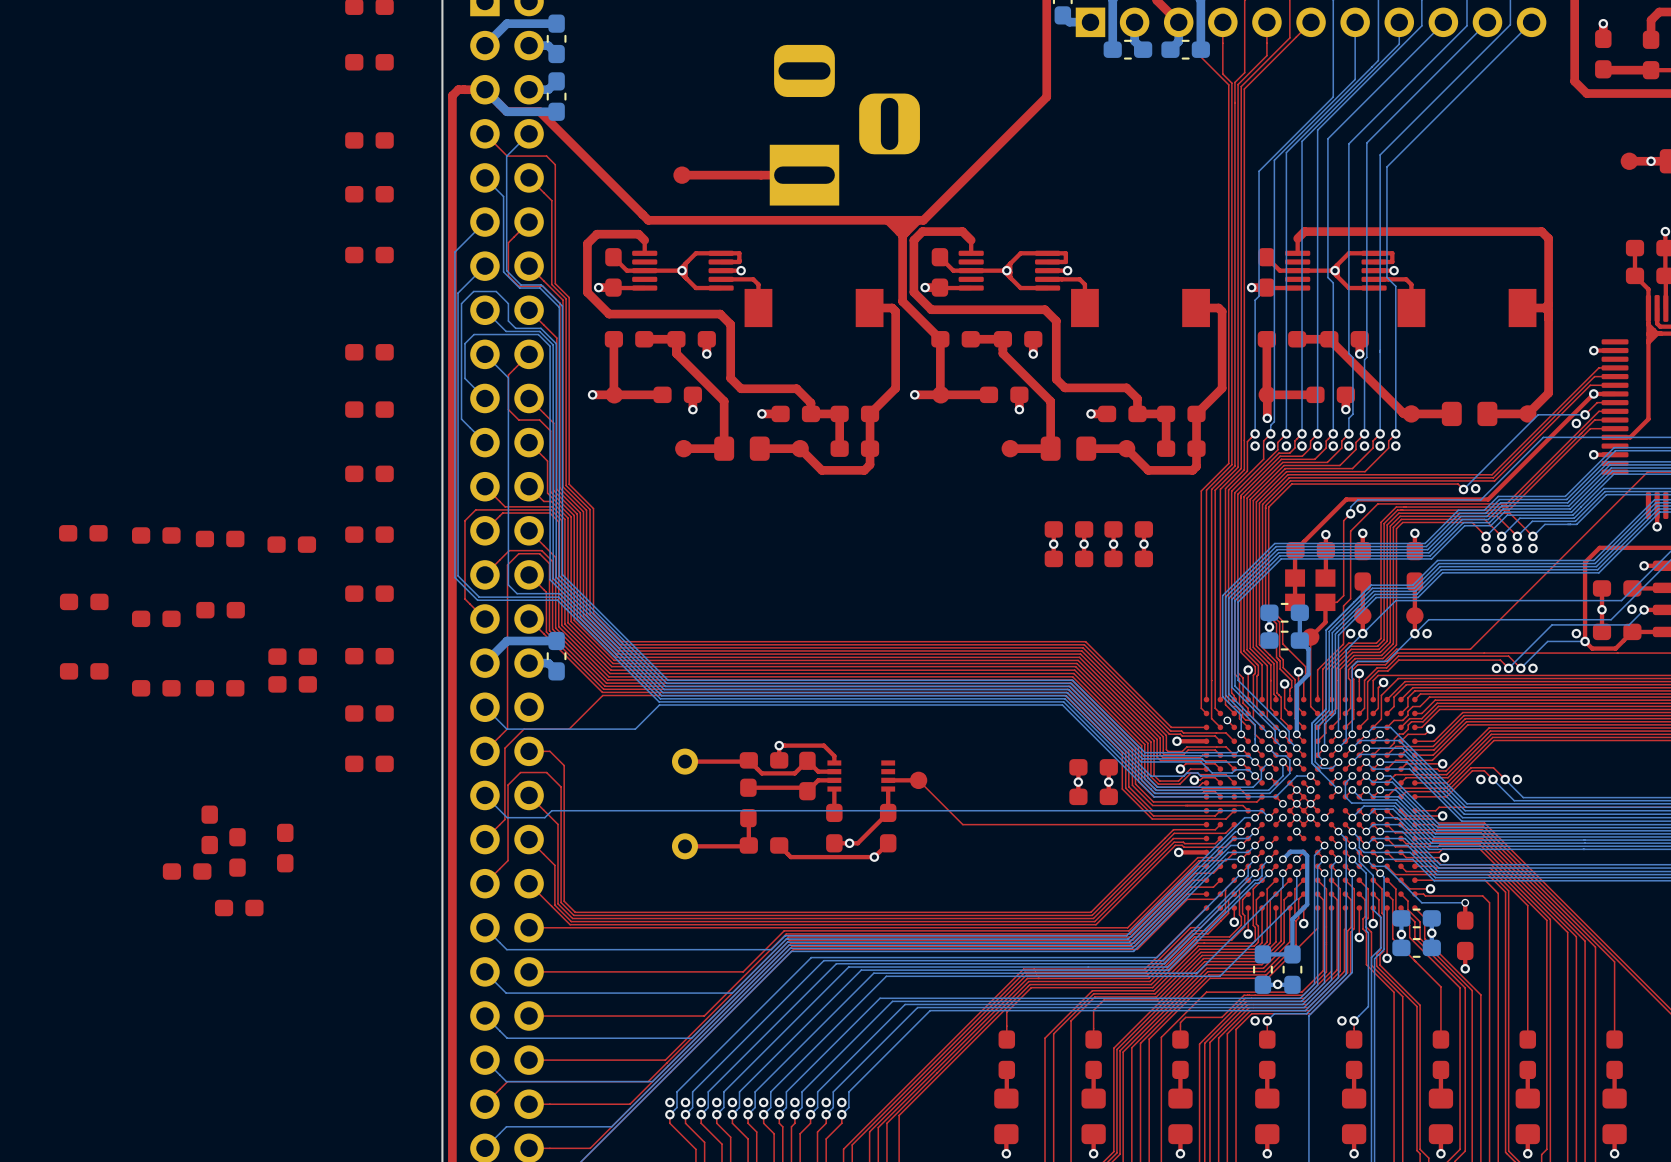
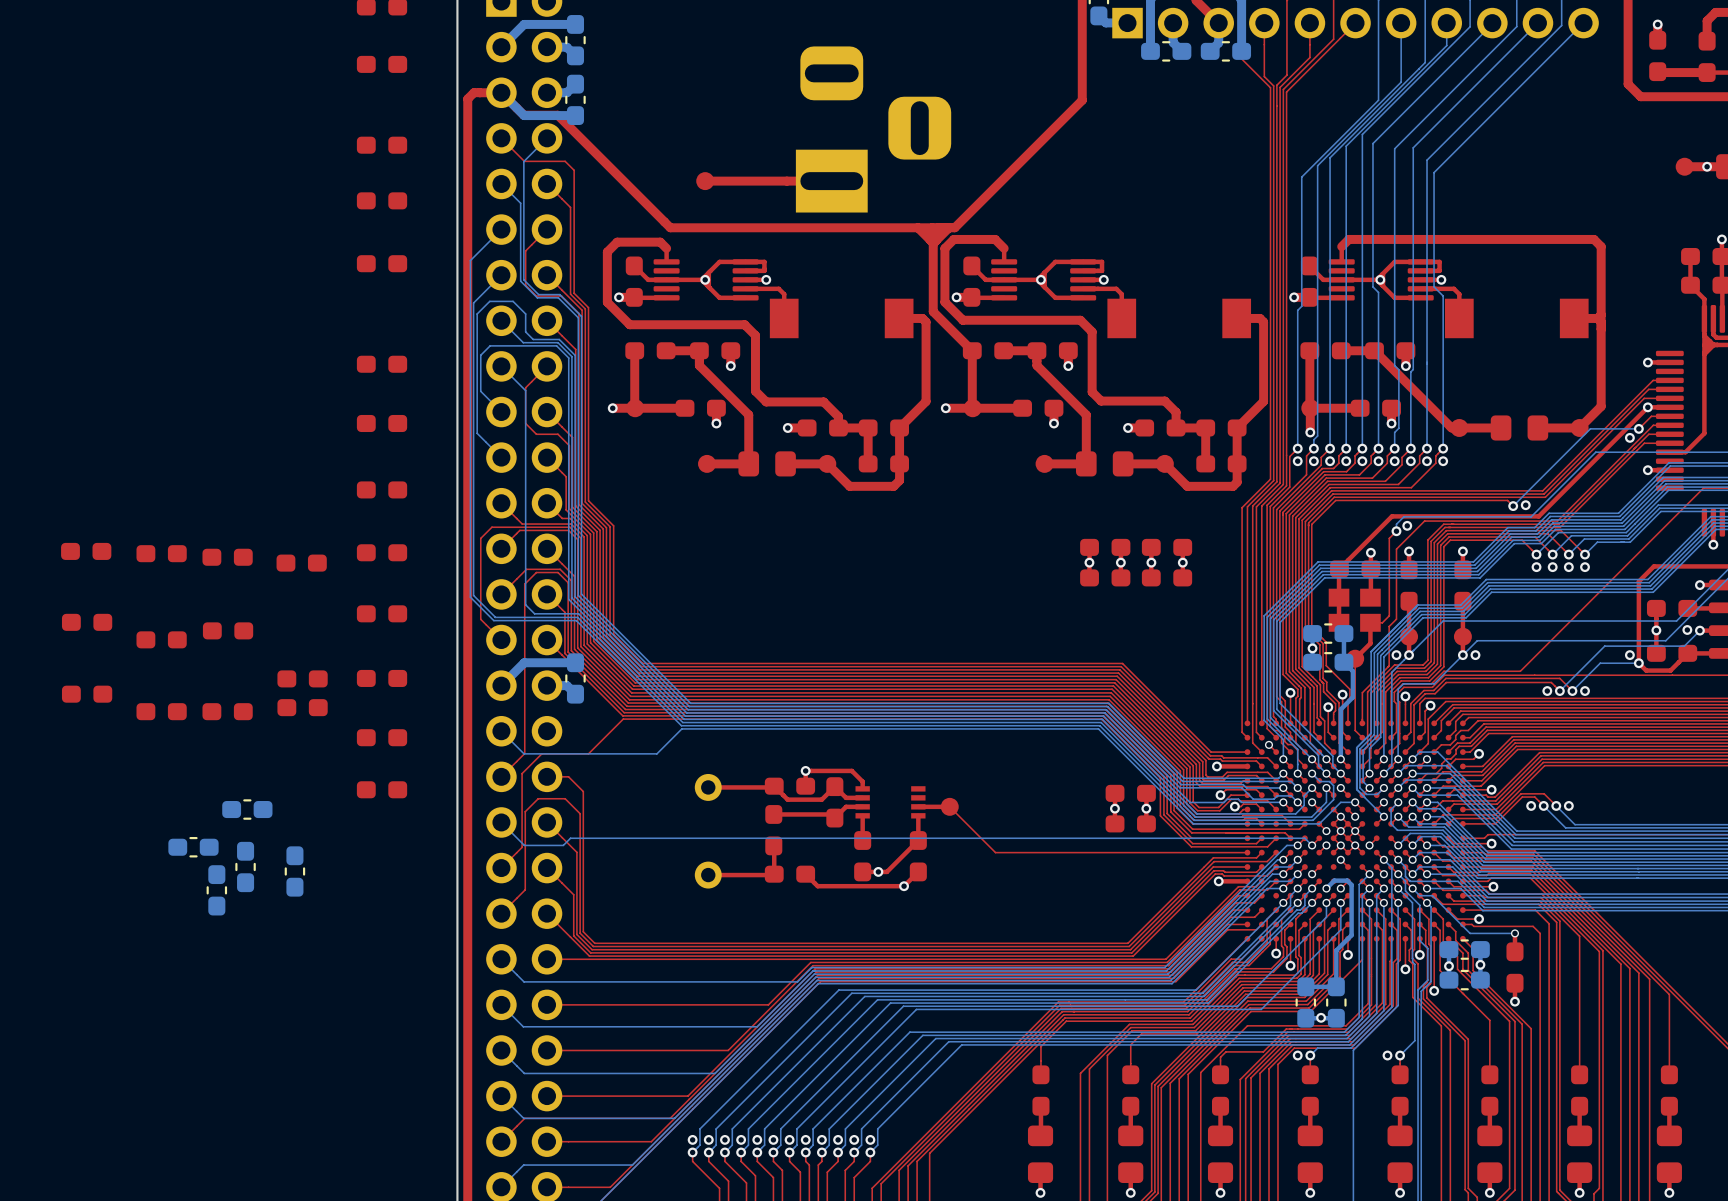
part side: top (209, 829) -> bottom (216, 890)
part side: top (285, 848) -> bottom (294, 871)
part side: top (237, 852) -> bottom (245, 866)
part side: top (187, 871) -> bottom (193, 847)
part side: top (239, 907) -> bottom (247, 809)

